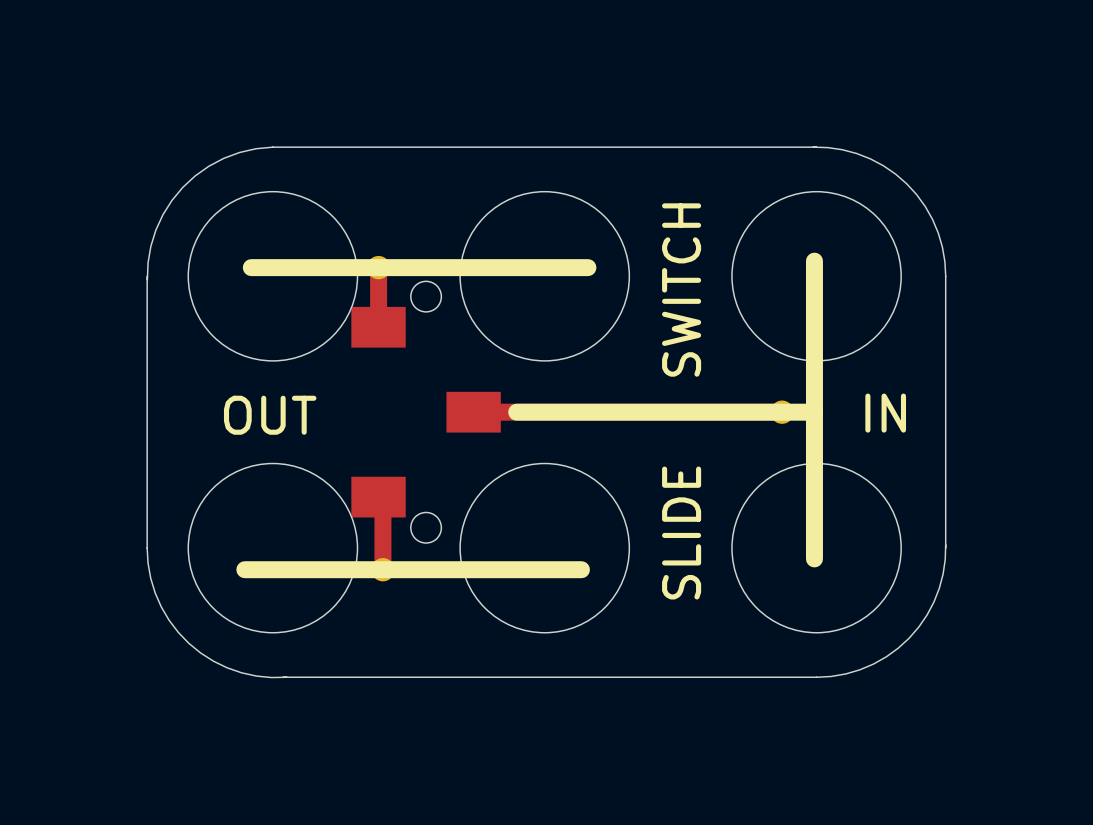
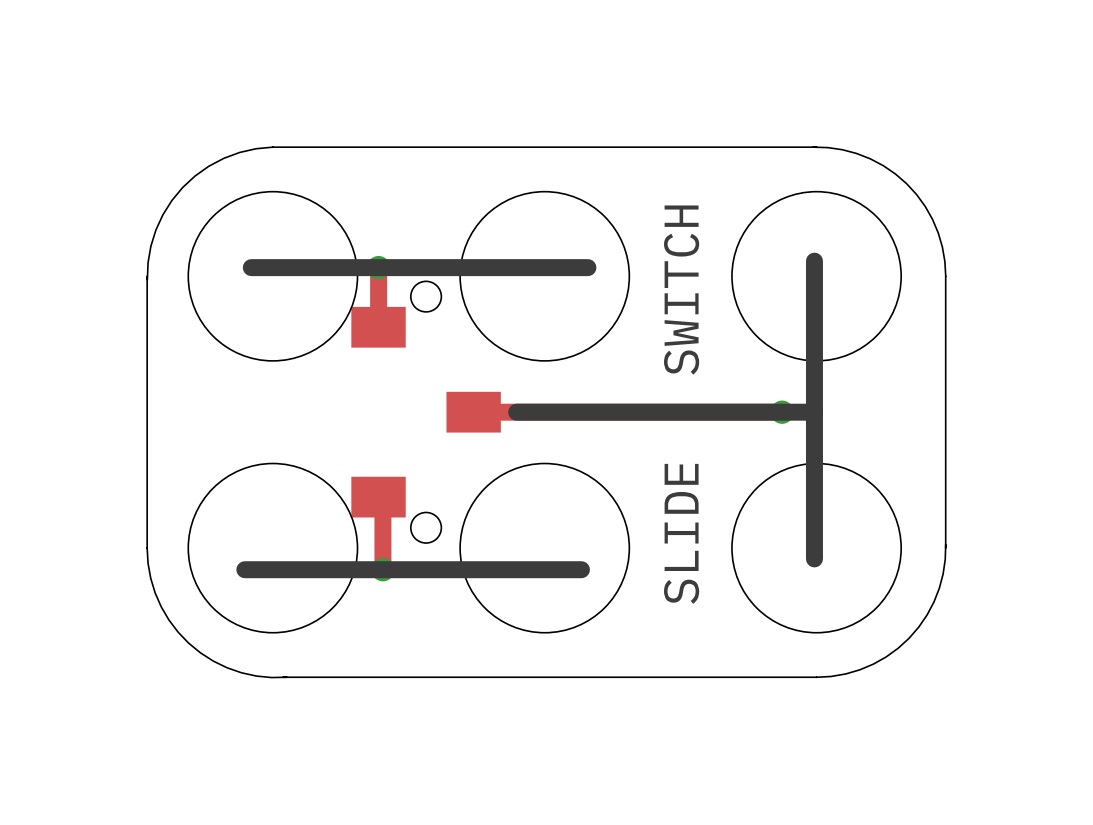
part text: IN (885, 413) -> none
part text: OUT (270, 415) -> none

